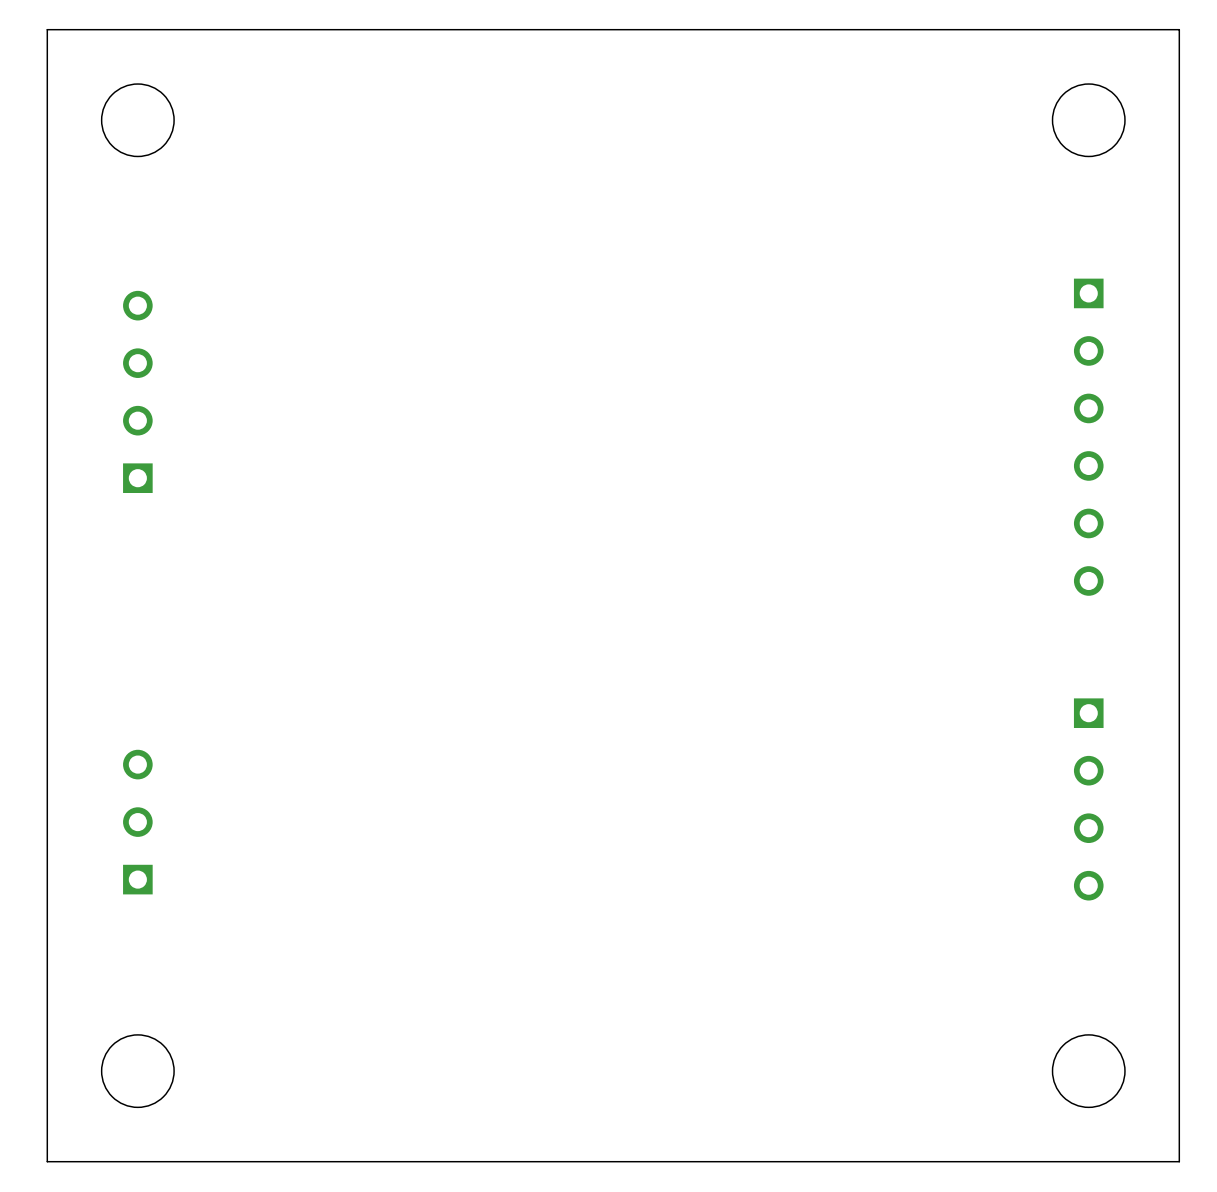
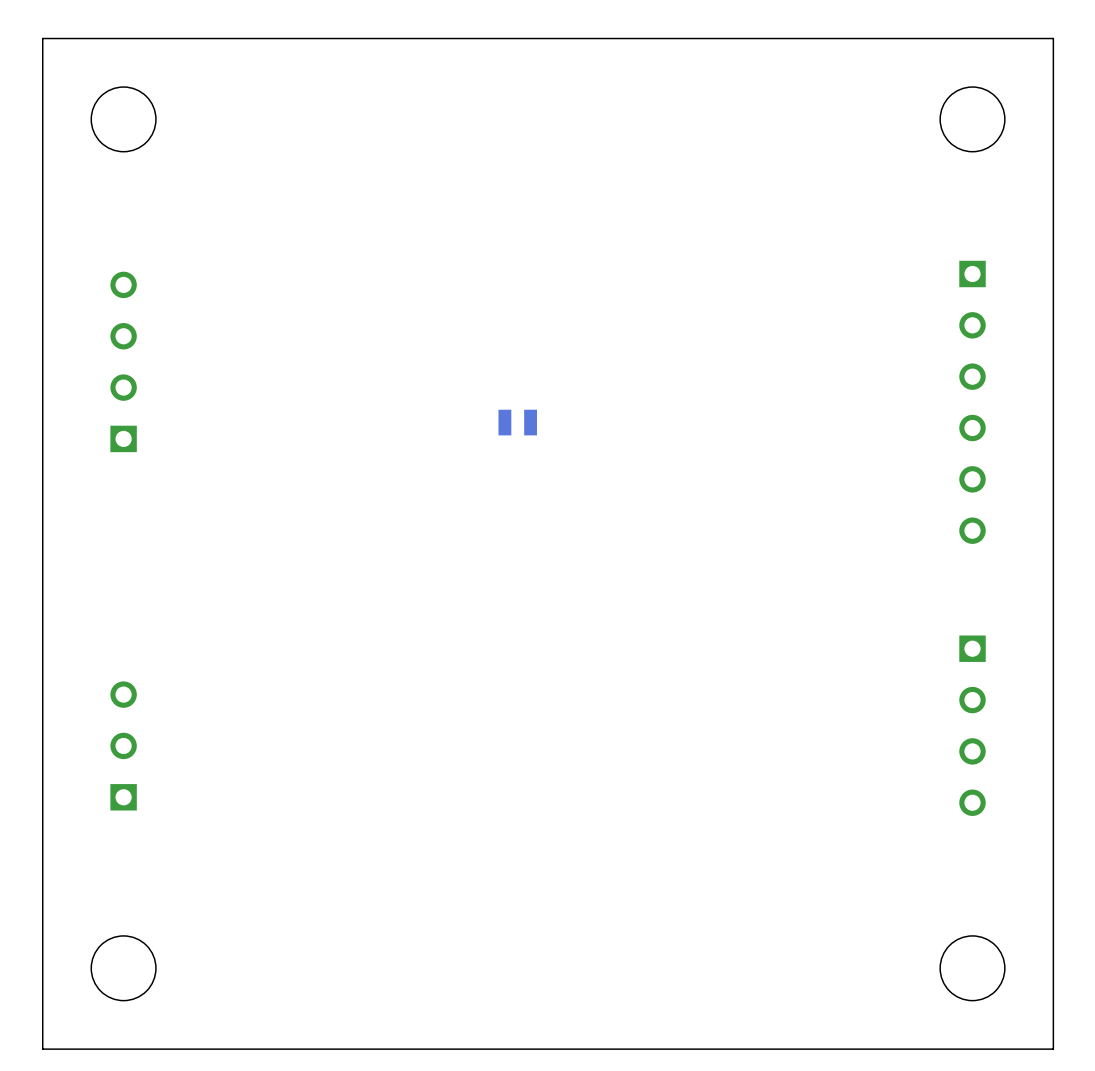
part: none -> (517, 422)

